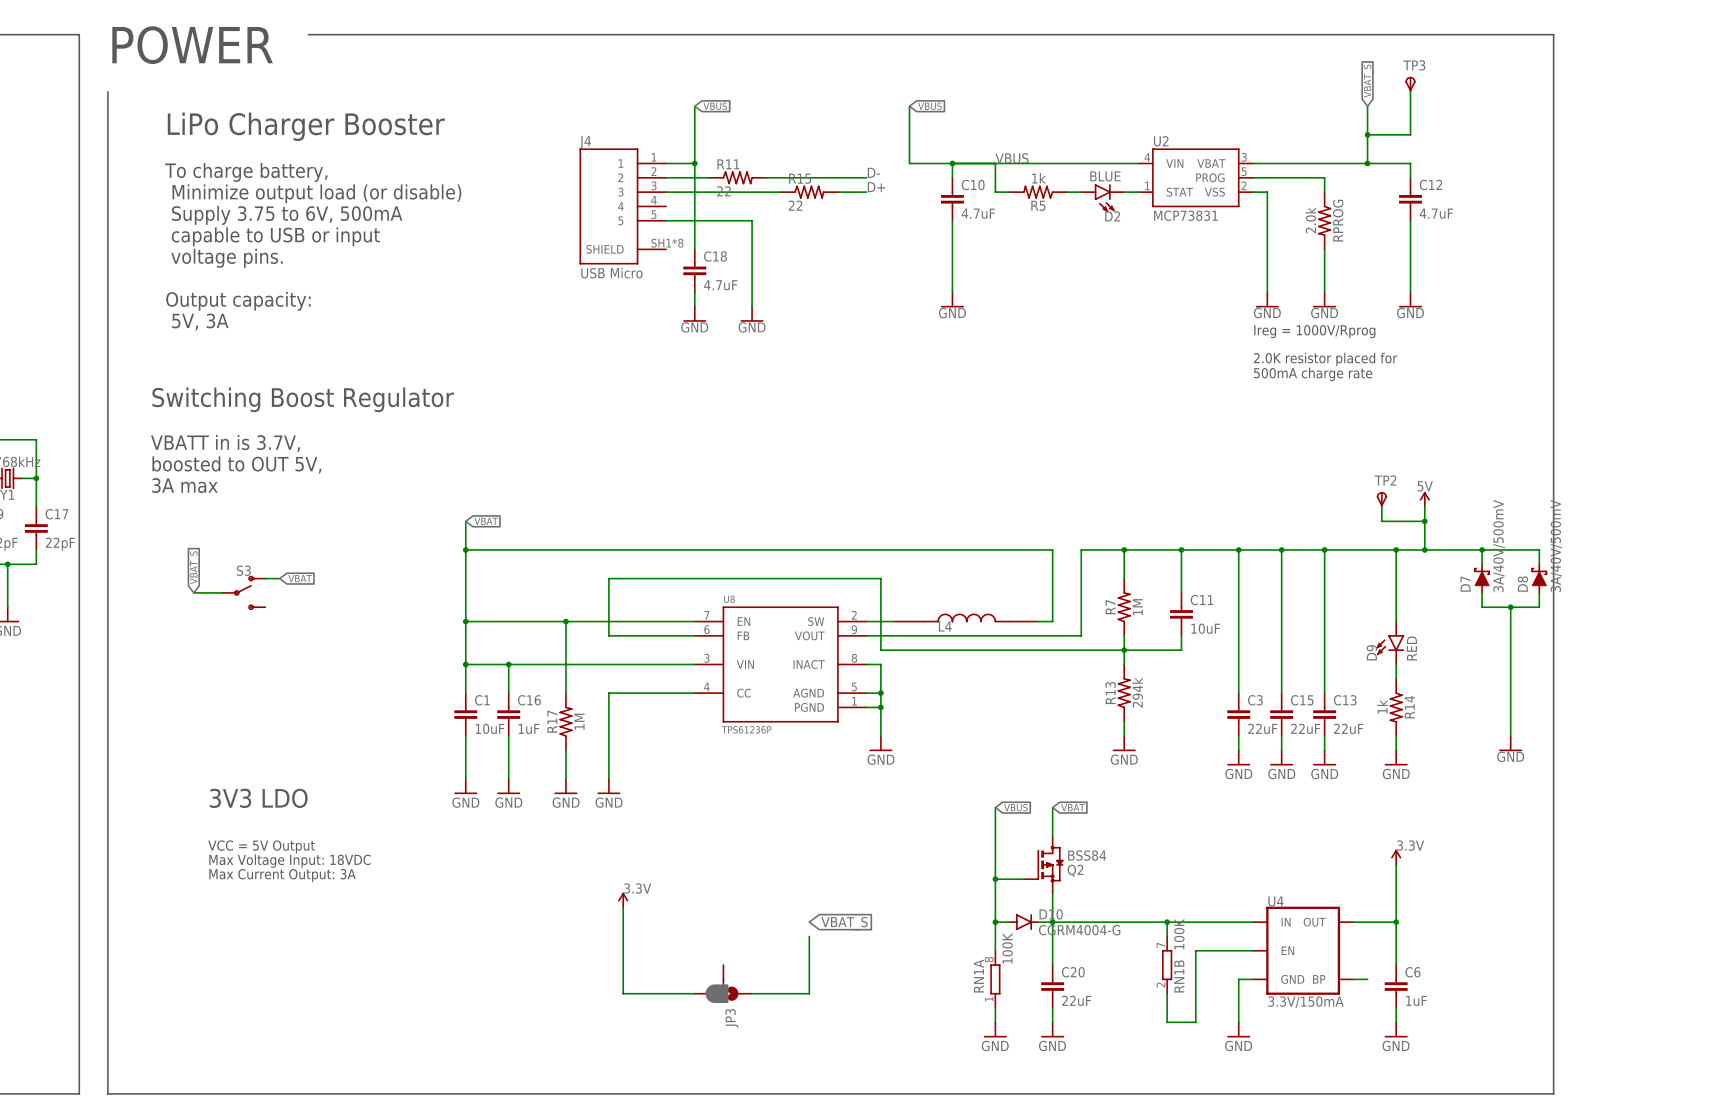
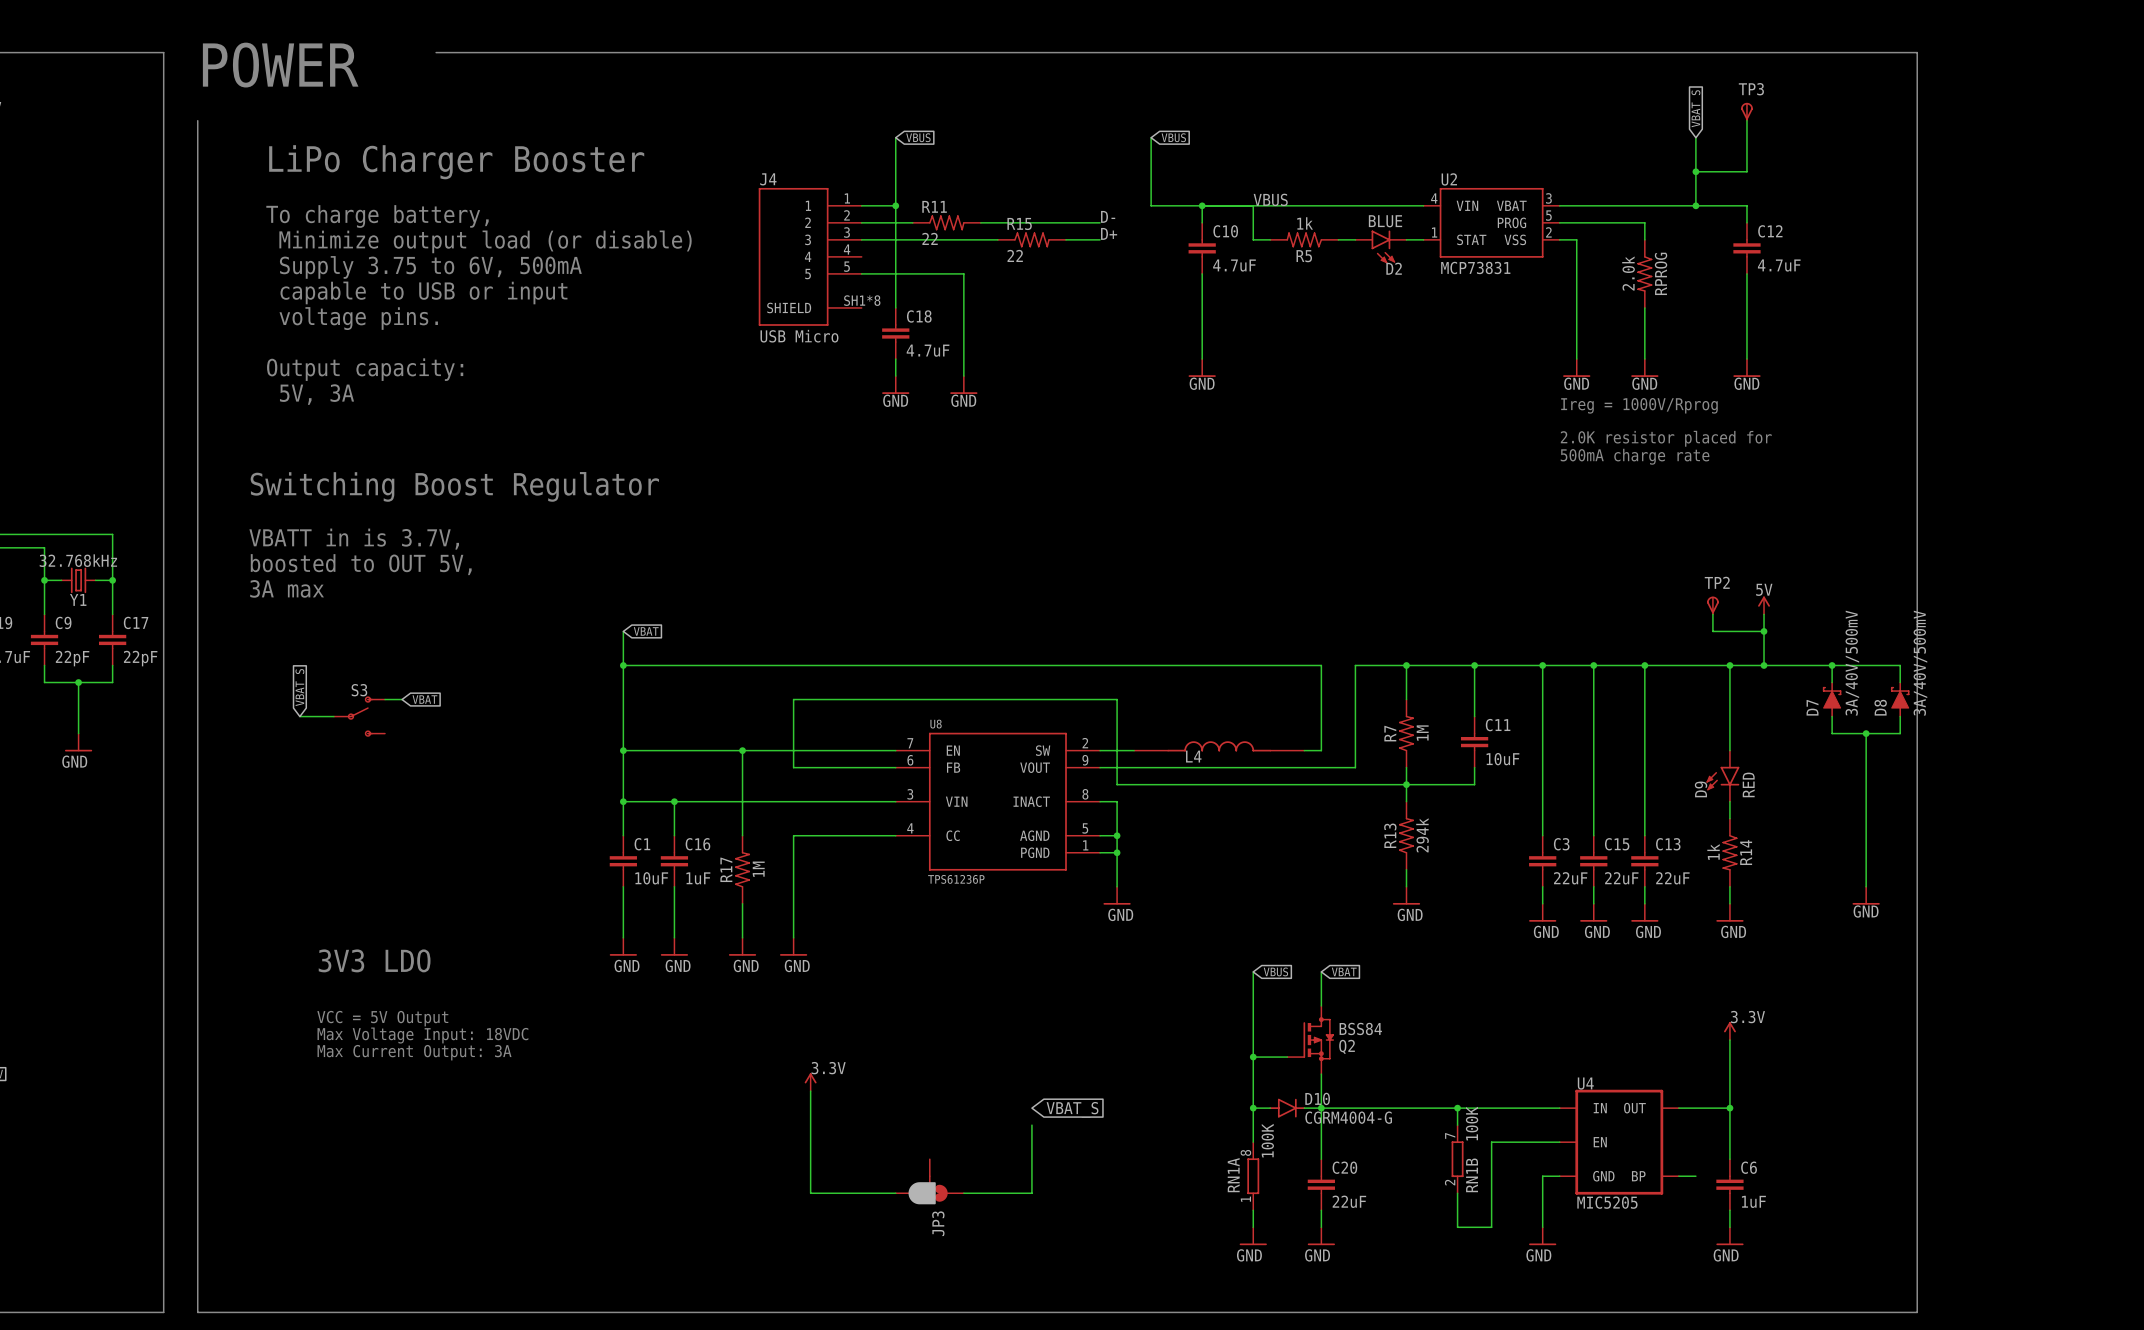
U4 value: 3.3V/150mA (1305, 1002) -> MIC5205 (1607, 1202)

